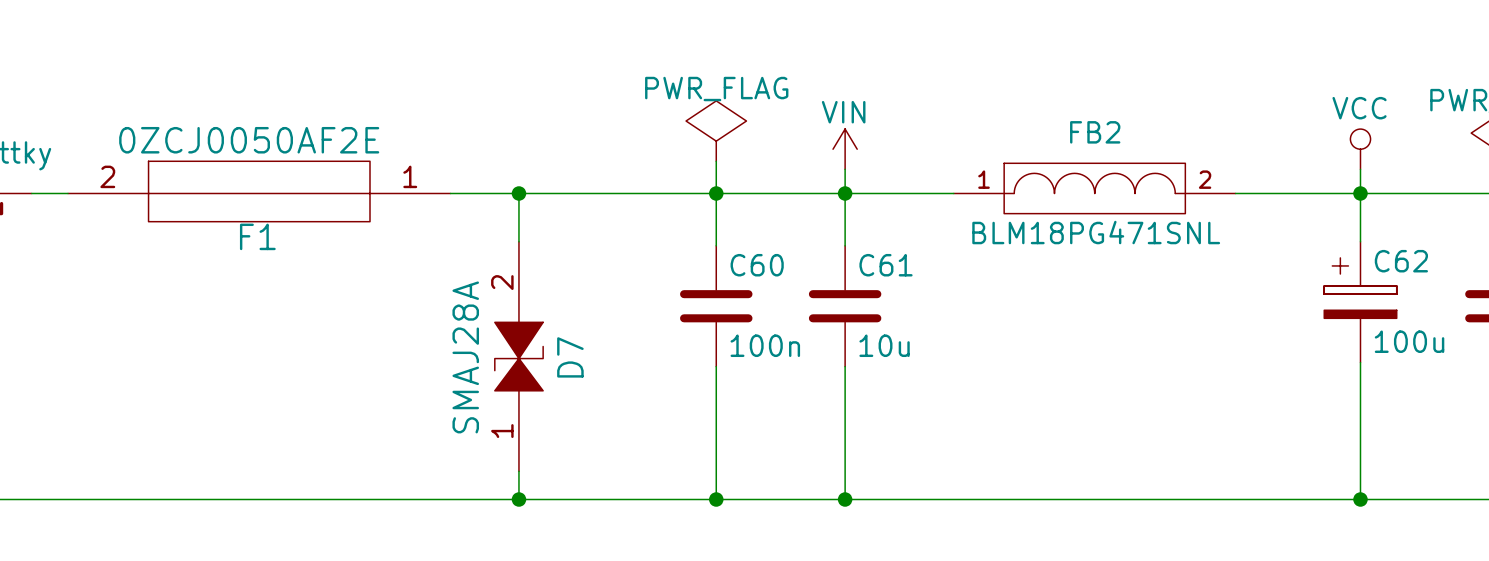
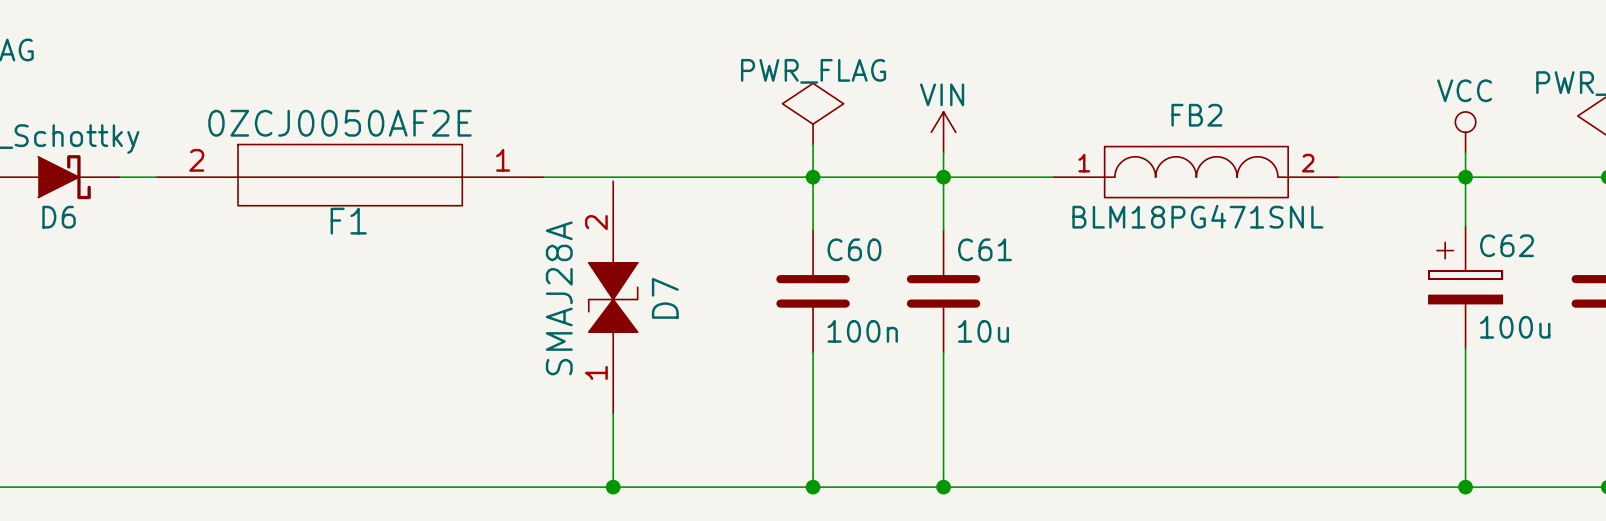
junction: (518, 193) -> none
D7 position: (518, 356) -> (613, 297)

